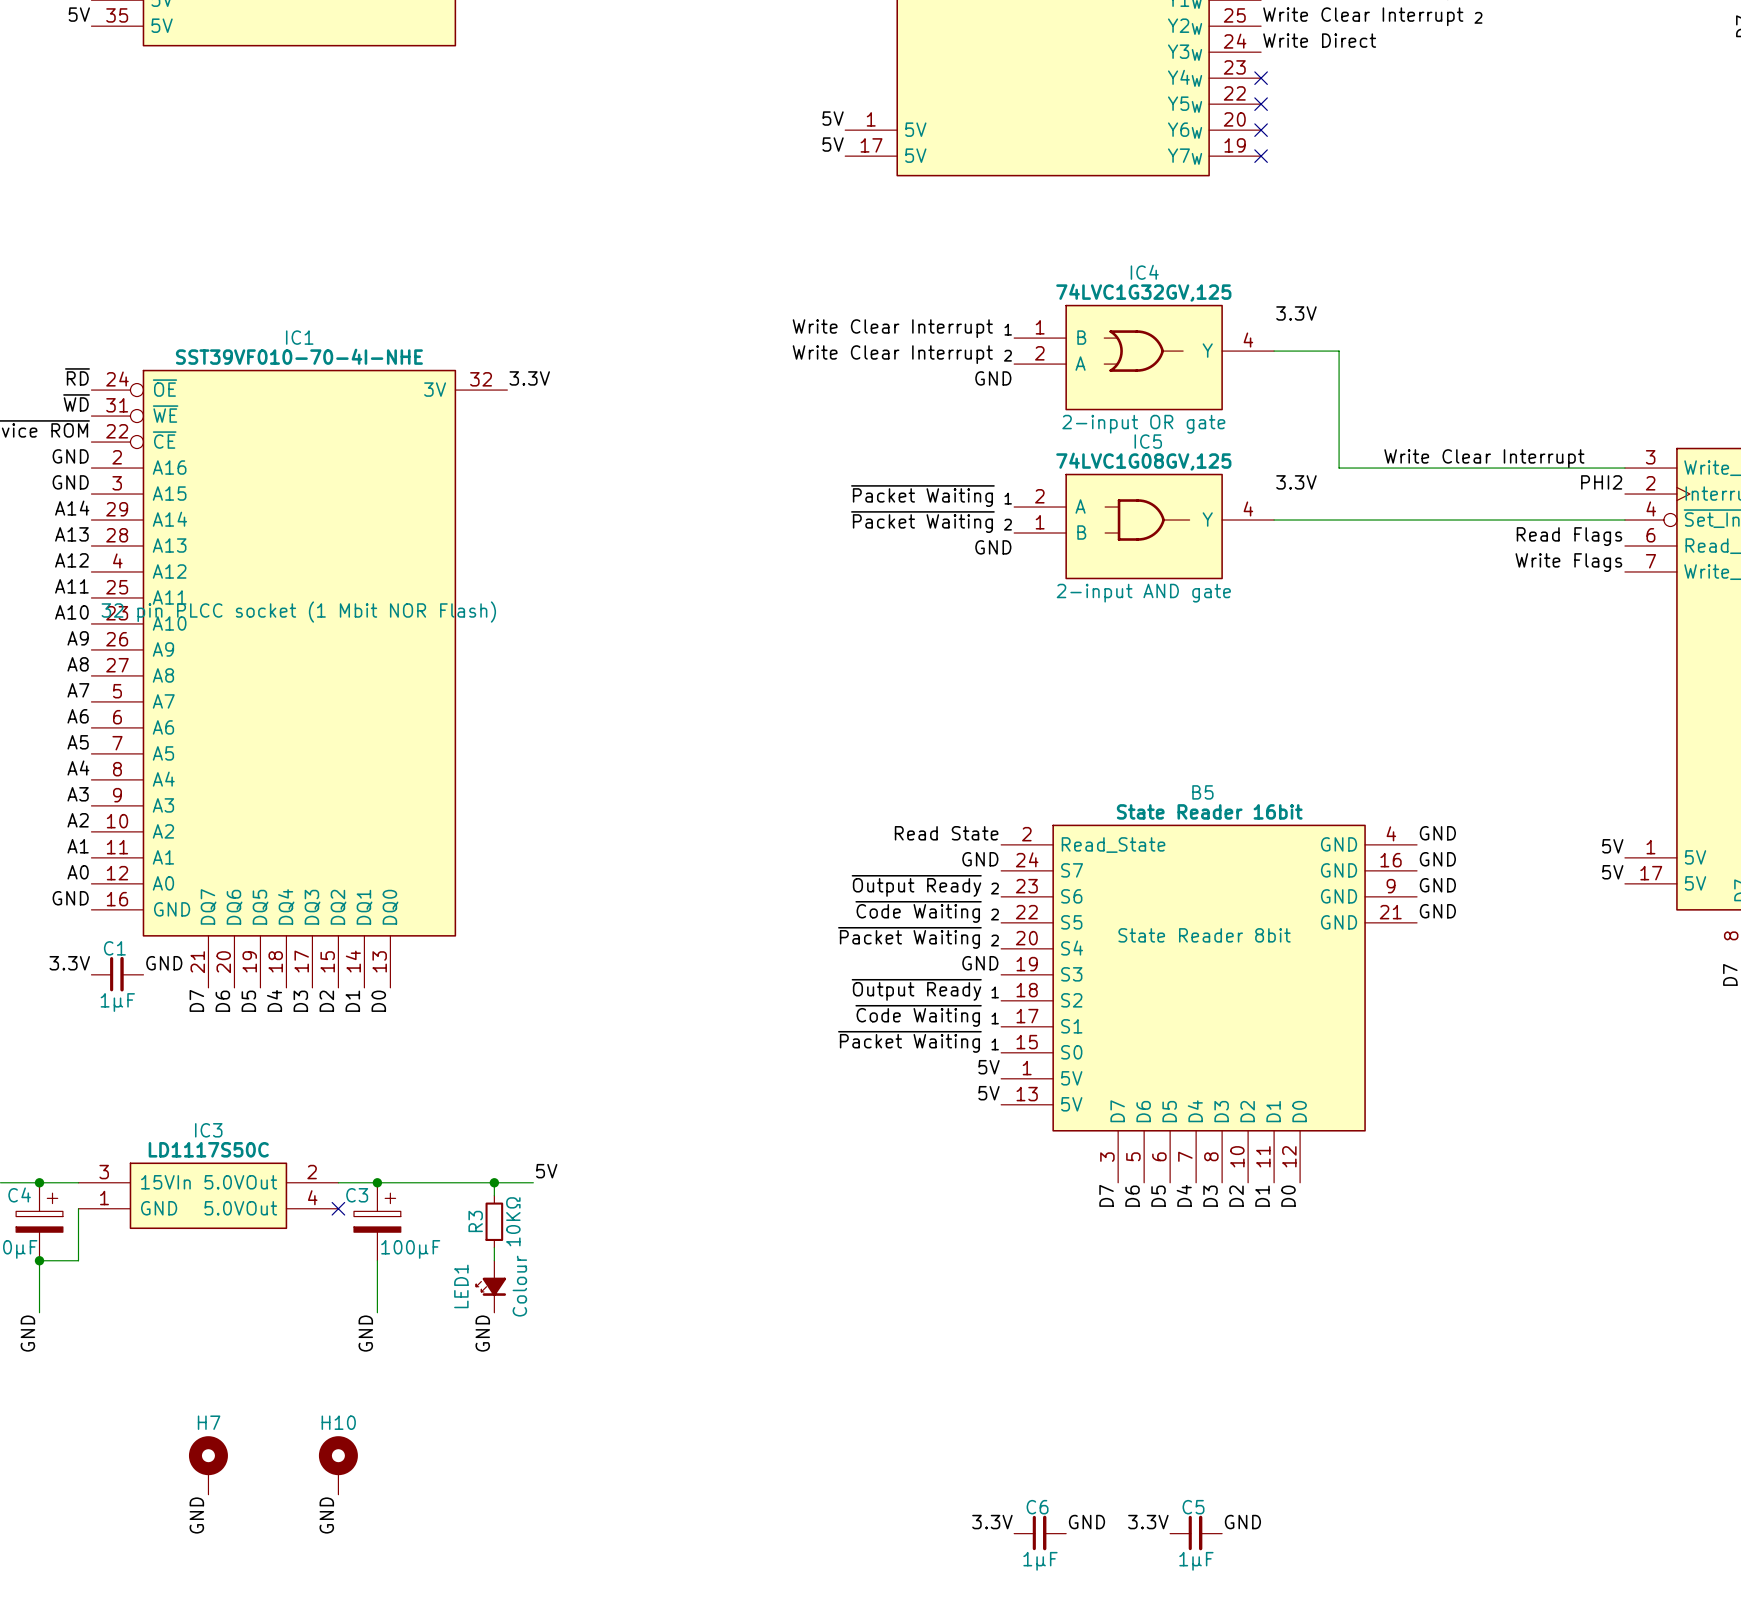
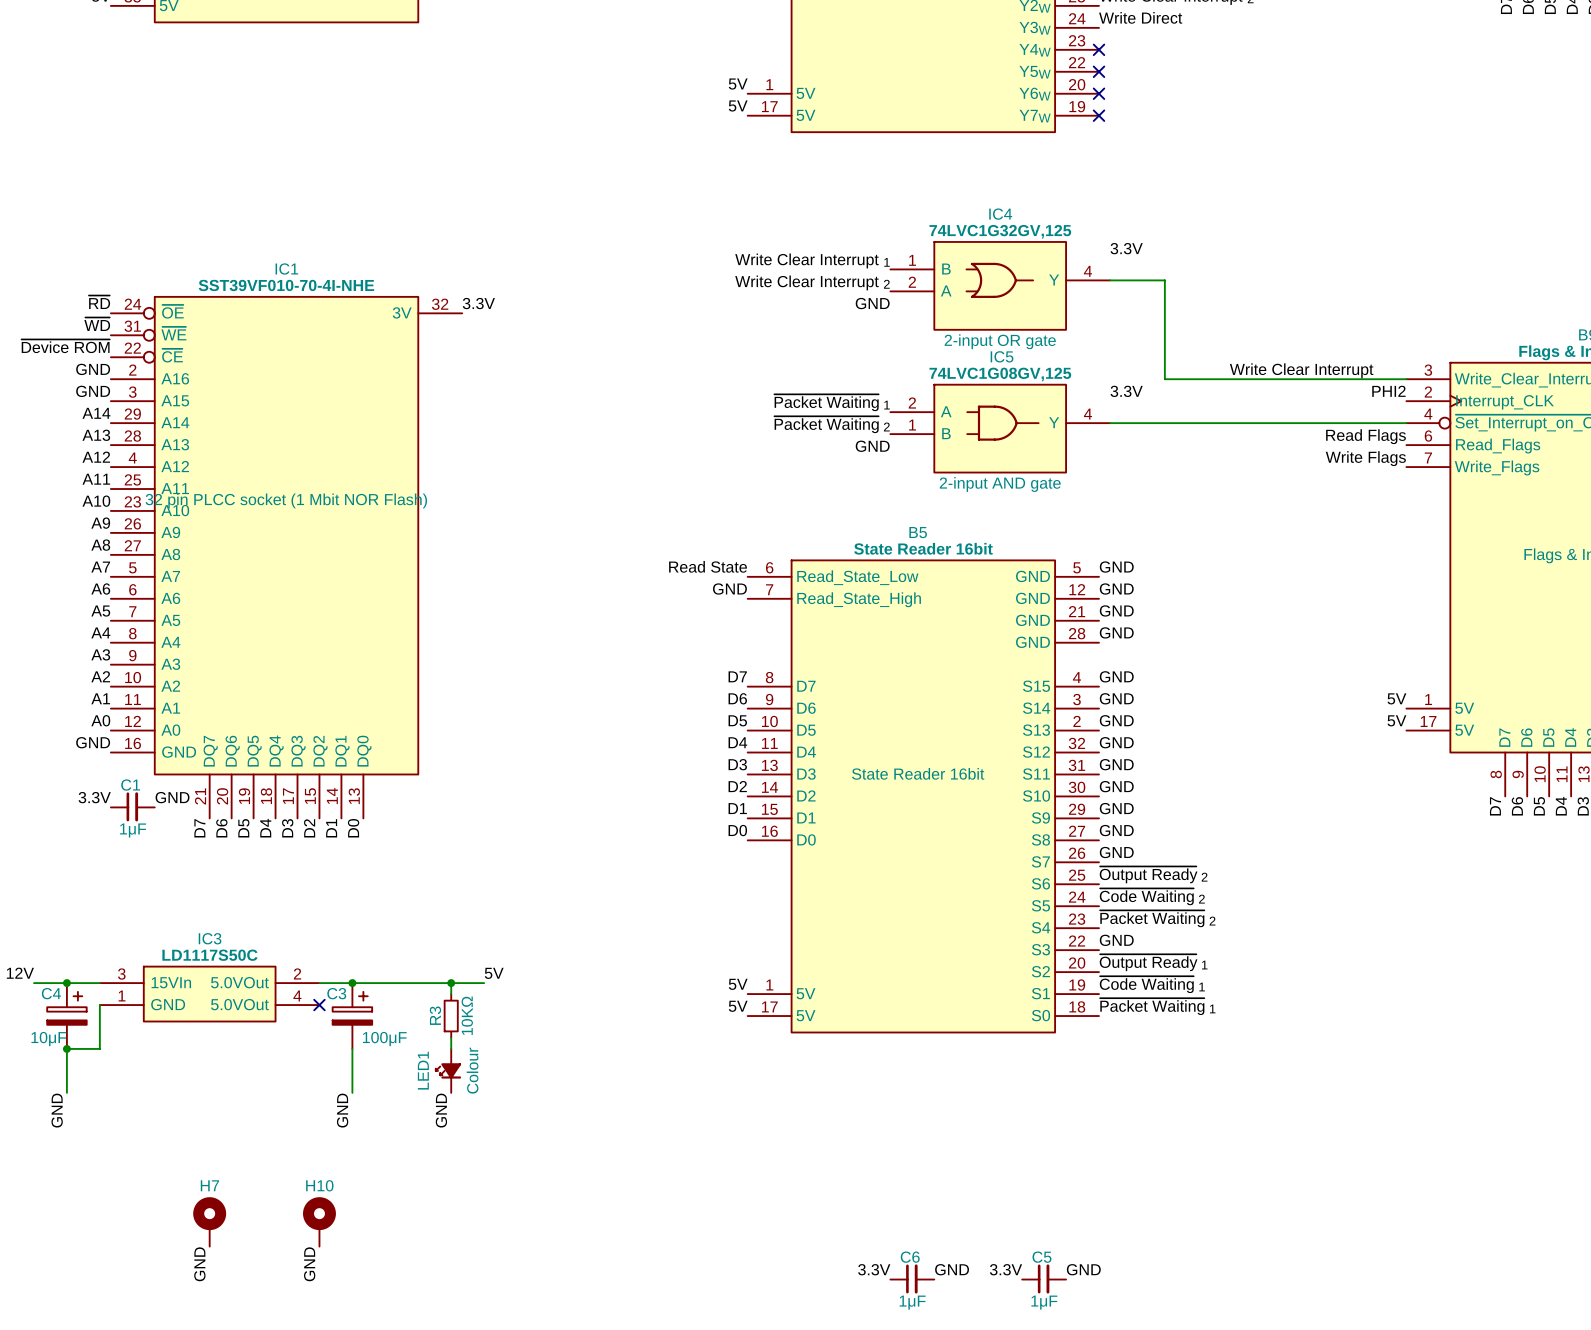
label: none -> GND (1116, 567)
label: none -> GND (729, 589)
label: none -> GND (1116, 589)
label: none -> GND (1116, 610)
label: none -> GND (1116, 632)
B5 name position: B5 (1202, 792) -> B5 (918, 532)
B5 value position: State Reader 16bit (1209, 811) -> State Reader 16bit (923, 548)
label: none -> D7 (737, 676)
label: none -> GND (1116, 676)
B5 symbol: [1001, 824, 1418, 1183] -> [747, 559, 1100, 1034]
label position: Read State (946, 833) -> Read State (708, 566)
label: GND (1437, 833) -> none
label: none -> D6 (737, 698)
label: none -> GND (1116, 698)
label: GND (980, 859) -> none
label: GND (1437, 859) -> none
label: none -> D5 (737, 720)
label: none -> GND (1116, 720)
label: ~{Output Ready} 2 (925, 885) -> none
label: GND (1437, 885) -> none
label: none -> D4 (737, 742)
label: none -> GND (1116, 742)
label: ~{Code Waiting} 2 (927, 911) -> none
label: GND (1437, 911) -> none
label: none -> D3 (737, 764)
label: none -> GND (1116, 764)
B5 text: State Reader 8bit (1204, 935) -> State Reader 16bit (918, 773)
label: ~{Packet Waiting} 2 (918, 937) -> none
label: none -> D2 (737, 786)
label: none -> GND (1116, 786)
label: GND (980, 963) -> none
label: none -> D1 (737, 808)
label: none -> GND (1116, 808)
label: ~{Output Ready} 1 (925, 989) -> none
label: none -> D0 (737, 830)
label: none -> GND (1116, 830)
label: ~{Code Waiting} 1 (927, 1015) -> none
label: none -> GND (1116, 852)
label: ~{Packet Waiting} 1 (918, 1041) -> none
label: none -> ~{Output Ready} 2 (1153, 874)
label: 5V (989, 1067) -> none
label: none -> ~{Code Waiting} 2 (1152, 896)
label: 5V (989, 1093) -> none
label: none -> ~{Packet Waiting} 2 (1157, 918)
label: none -> GND (1116, 940)
label: none -> ~{Output Ready} 1 (1153, 962)
label: none -> 5V (738, 984)
label: none -> ~{Code Waiting} 1 (1152, 984)
label: D7 (1106, 1195) -> none
label: D4 (1184, 1195) -> none
label: D6 (1132, 1196) -> none
label: D5 (1158, 1196) -> none
label: D3 (1210, 1196) -> none
label: D2 (1236, 1196) -> none
label: D1 (1262, 1196) -> none
label: D0 (1288, 1196) -> none
label: none -> 5V (738, 1006)
label: none -> ~{Packet Waiting} 1 (1157, 1006)

